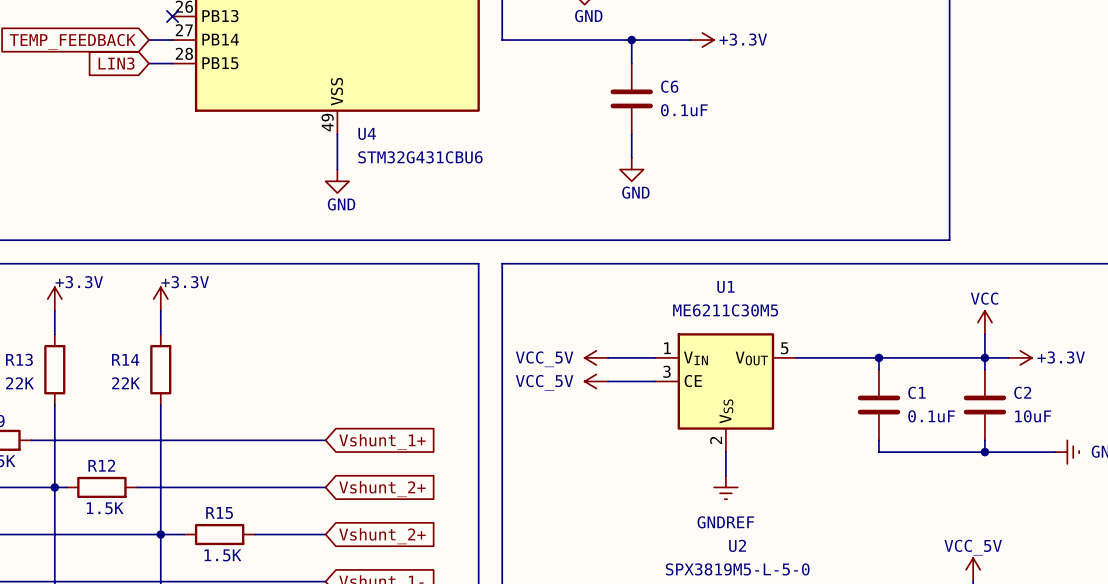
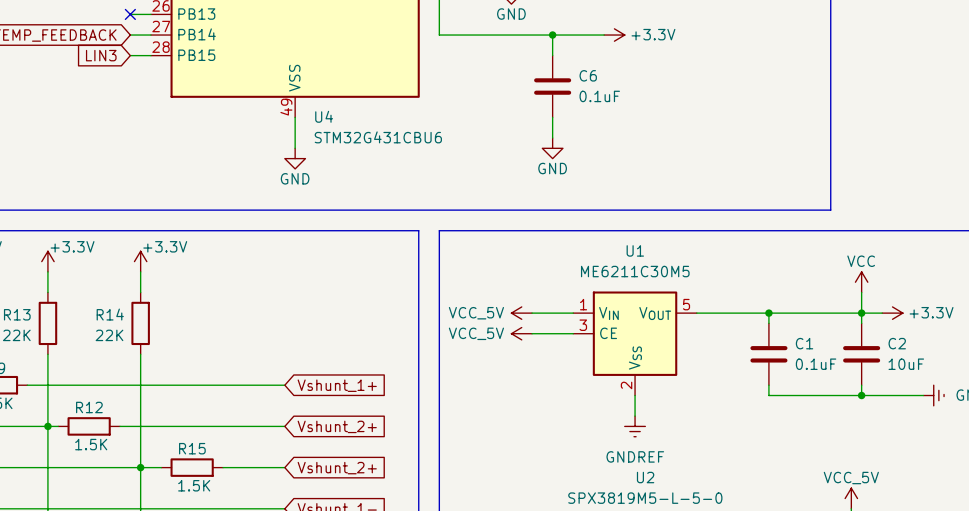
wire: none -> (130, 14) (150, 14)
no-connect mark: none -> (130, 14)
no-connect mark: (172, 16) -> none

